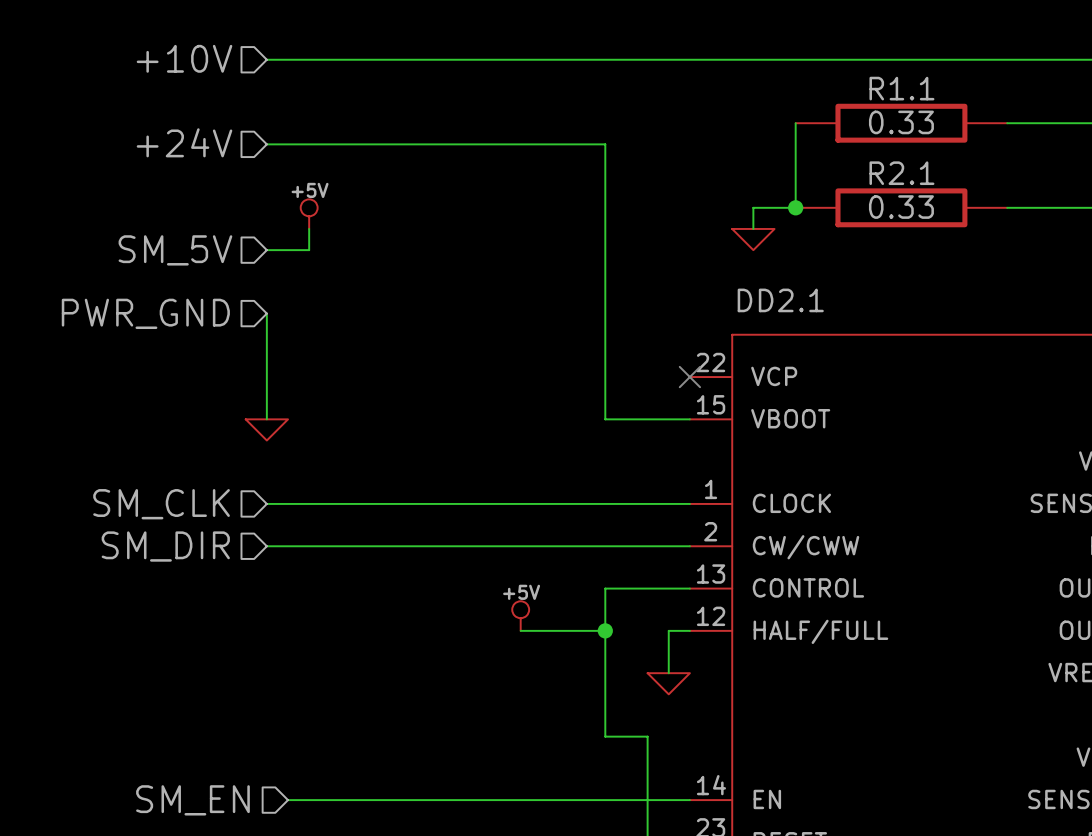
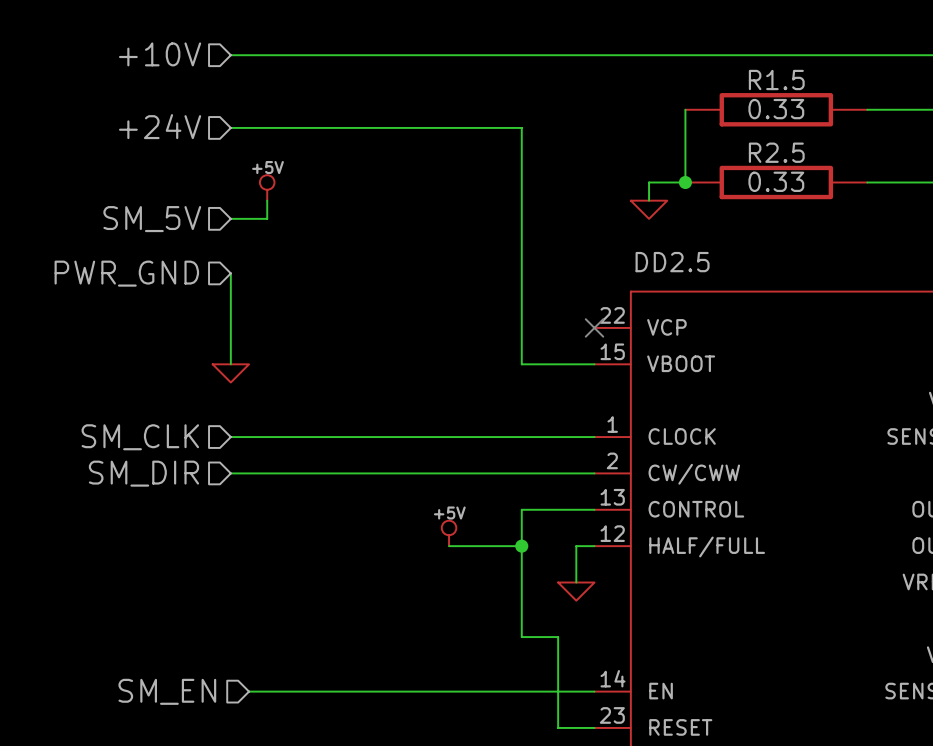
R1.1 name: R1.1 (901, 88) -> R1.5 (776, 79)
R2.1 name: R2.1 (901, 173) -> R2.5 (776, 152)
DD2.1 name: DD2.1 (780, 300) -> DD2.5 (672, 262)

